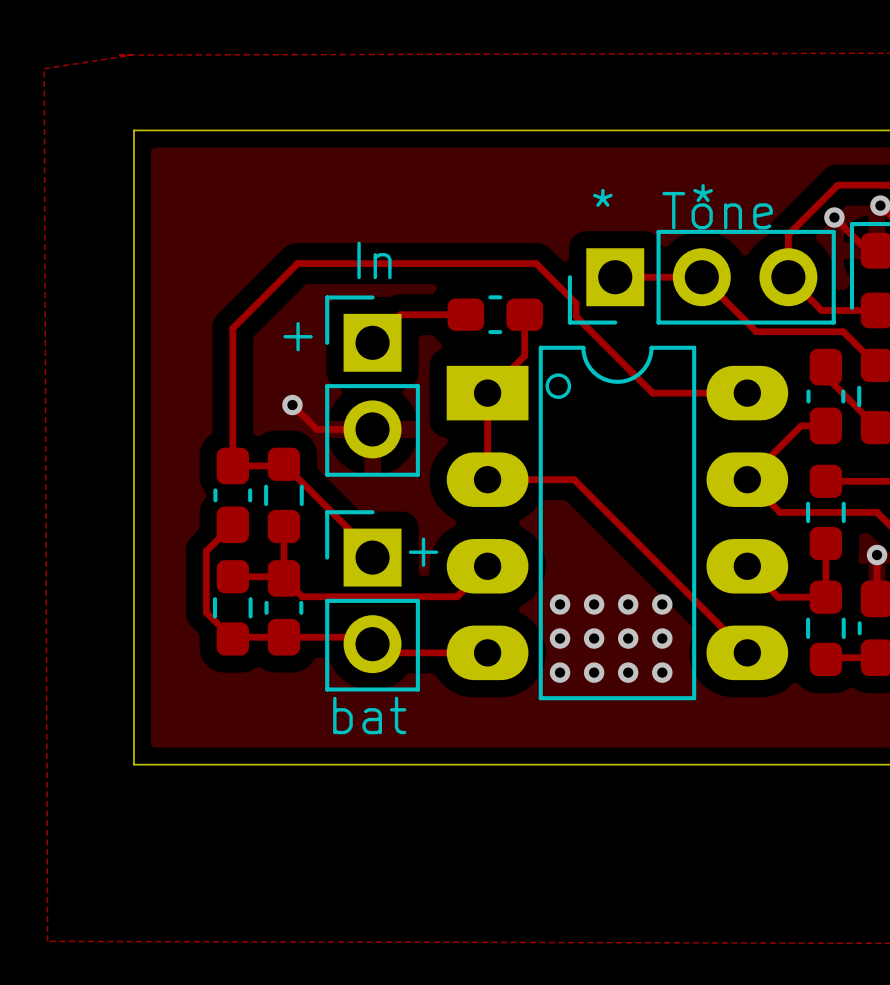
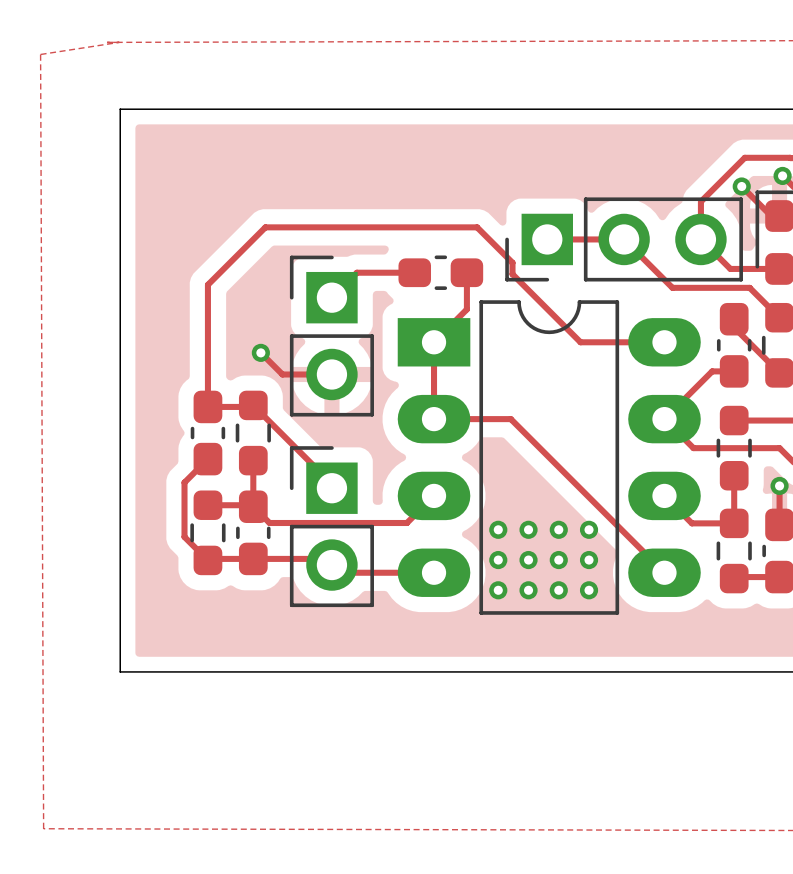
text: * (703, 193) -> none
text: * (602, 197) -> none
text: Tone (717, 210) -> none
text: In (374, 260) -> none
text: + (298, 336) -> none
drawing: [545, 373, 572, 399] -> none
text: + (423, 552) -> none
text: bat (369, 715) -> none

